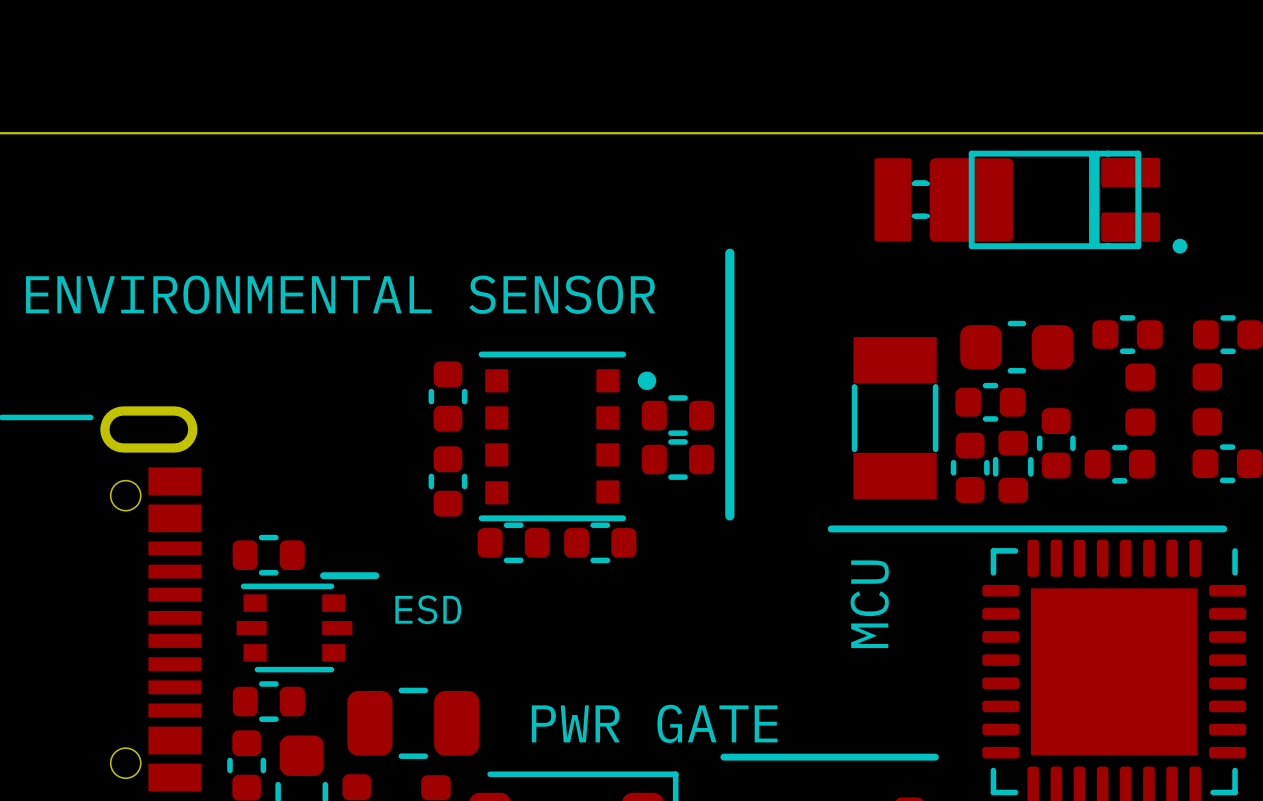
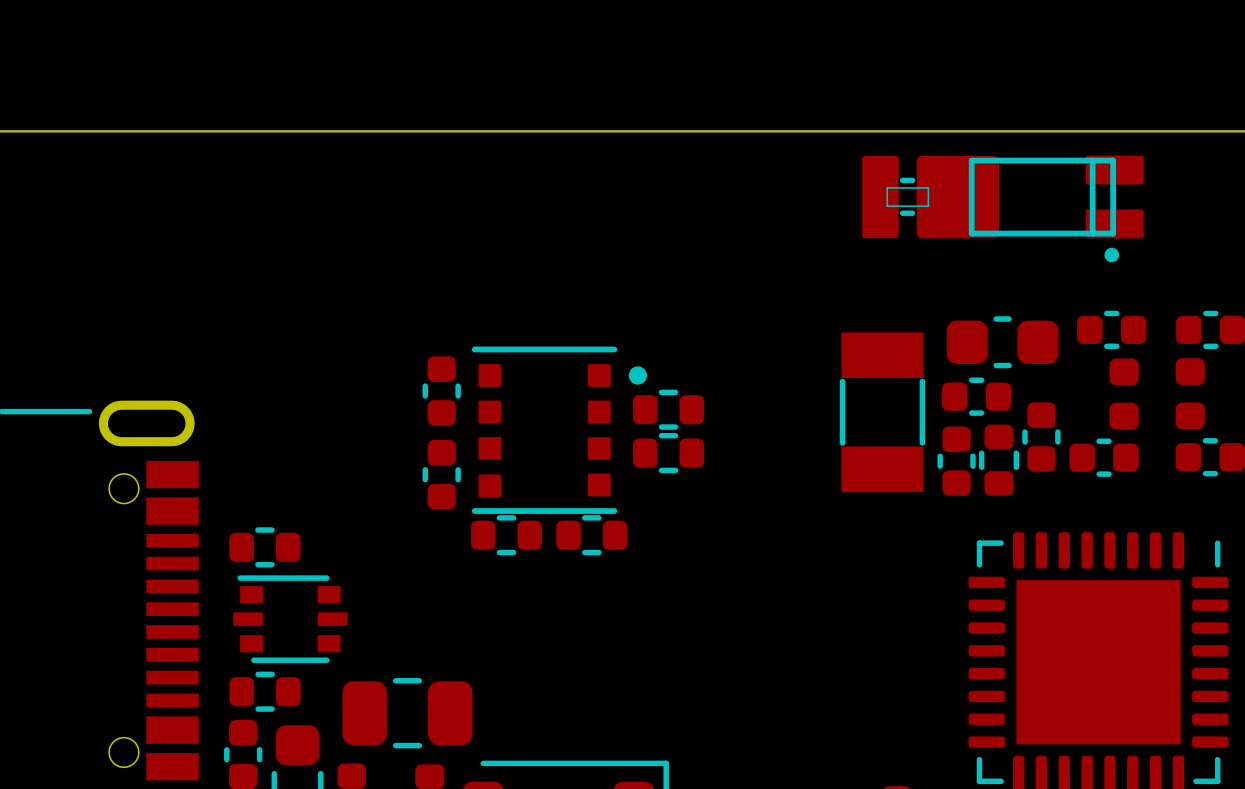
part footprint: [874, 150, 1188, 254] -> [862, 155, 1144, 263]
line: (729, 253) (729, 515) -> none
text: ENVIRONMENTAL SENSOR (340, 294) -> none
line: (831, 528) (1223, 528) -> none
line: (323, 575) (375, 575) -> none
text: MCU (869, 604) -> none
text: ESD (428, 609) -> none
text: PWR GATE (654, 723) -> none
line: (723, 757) (935, 757) -> none

